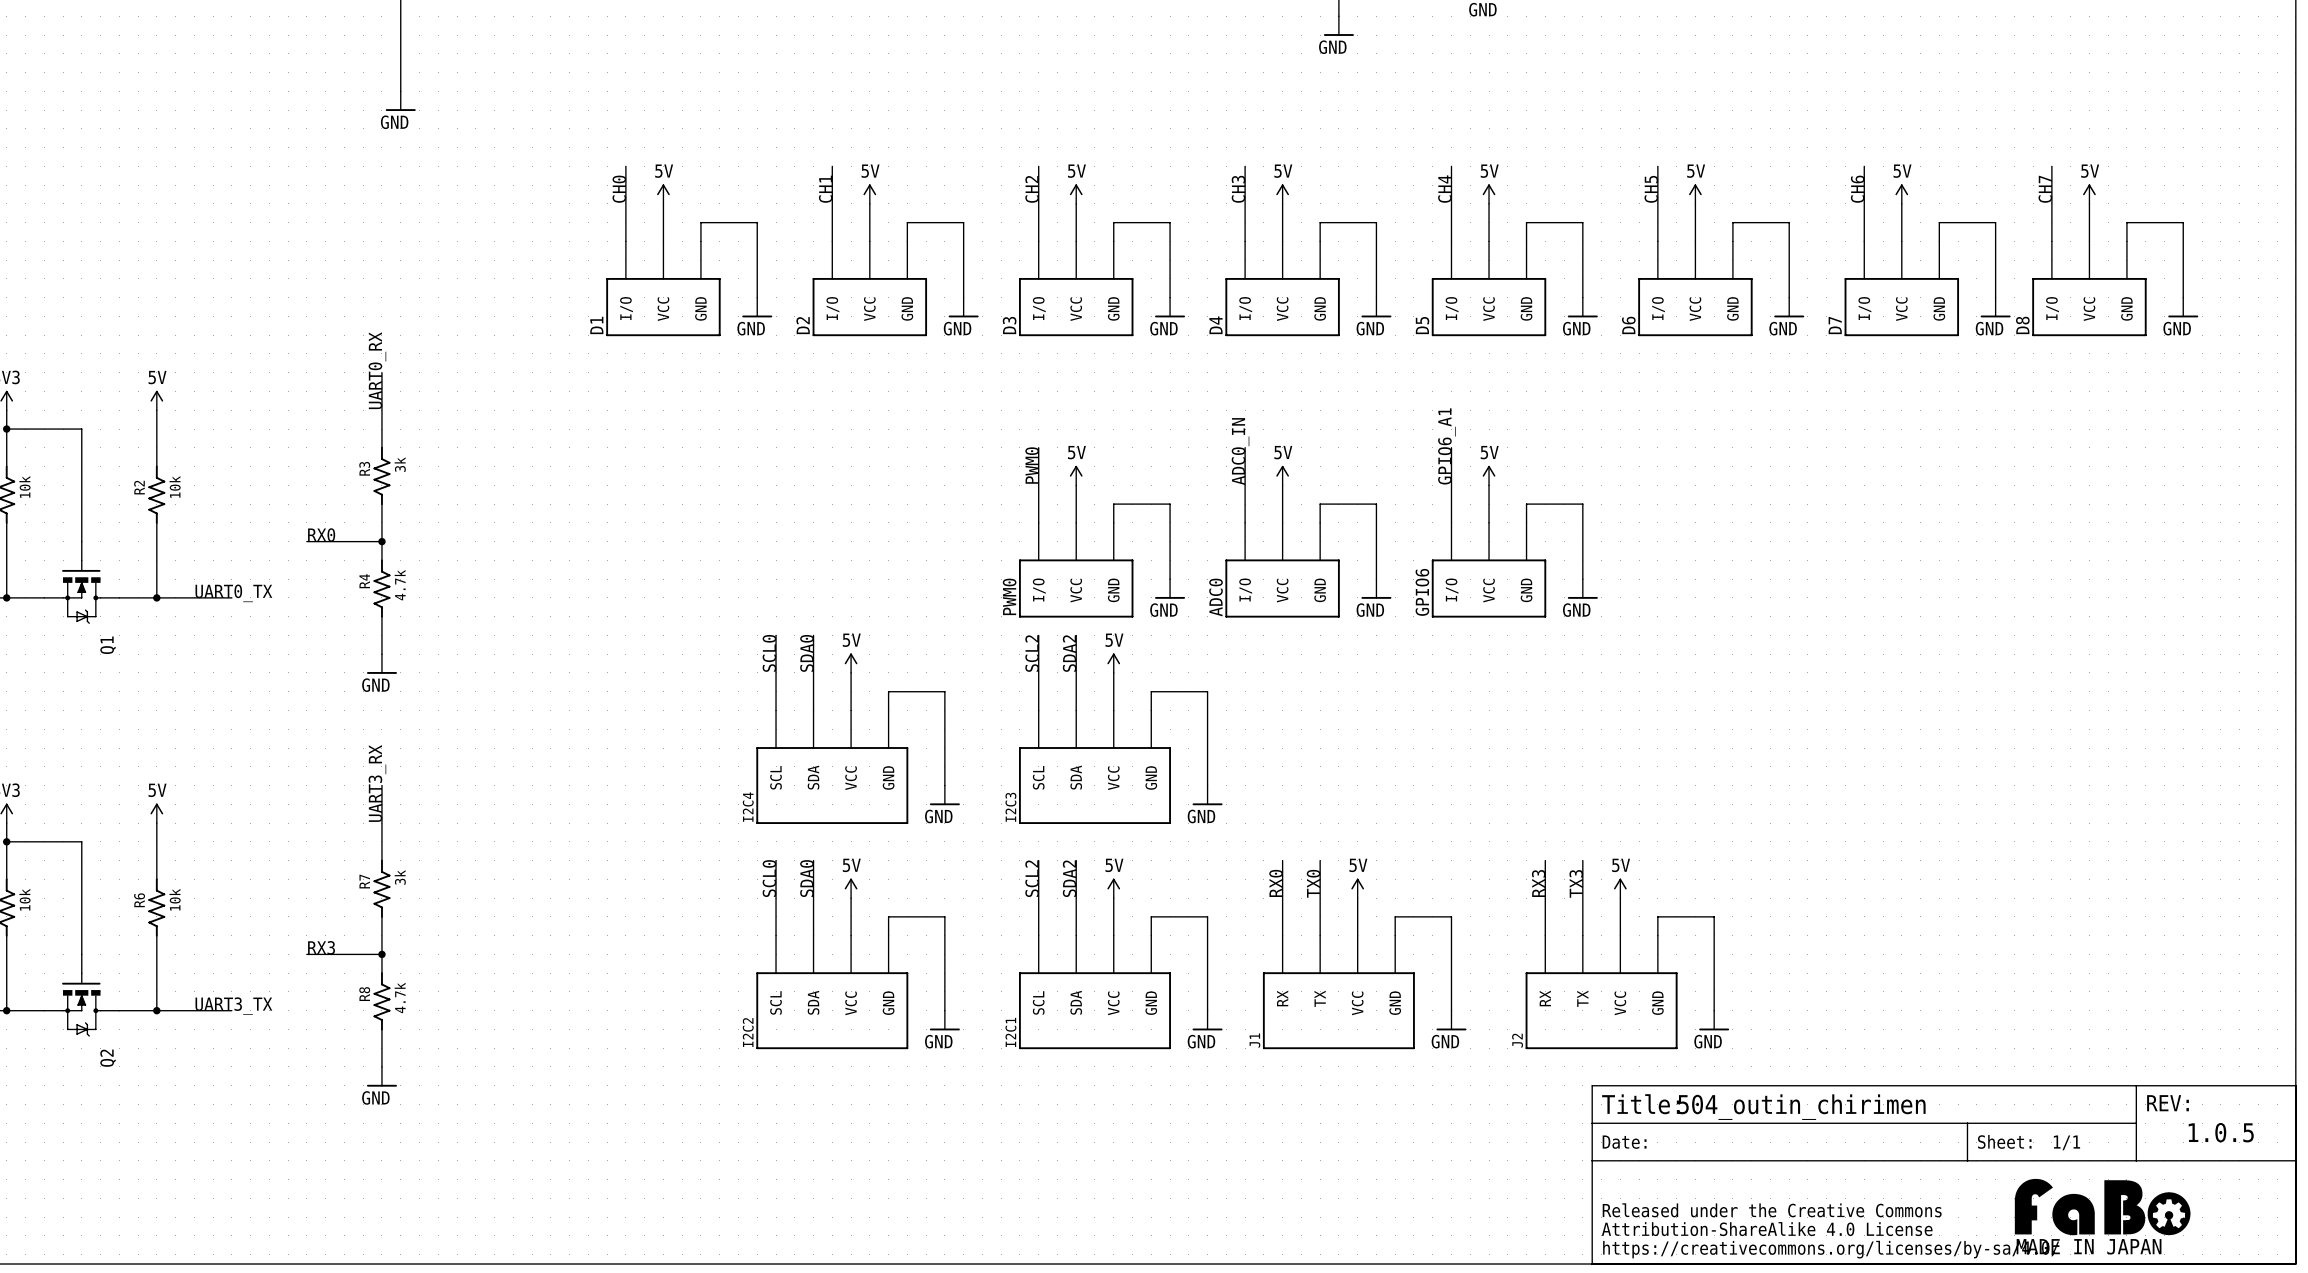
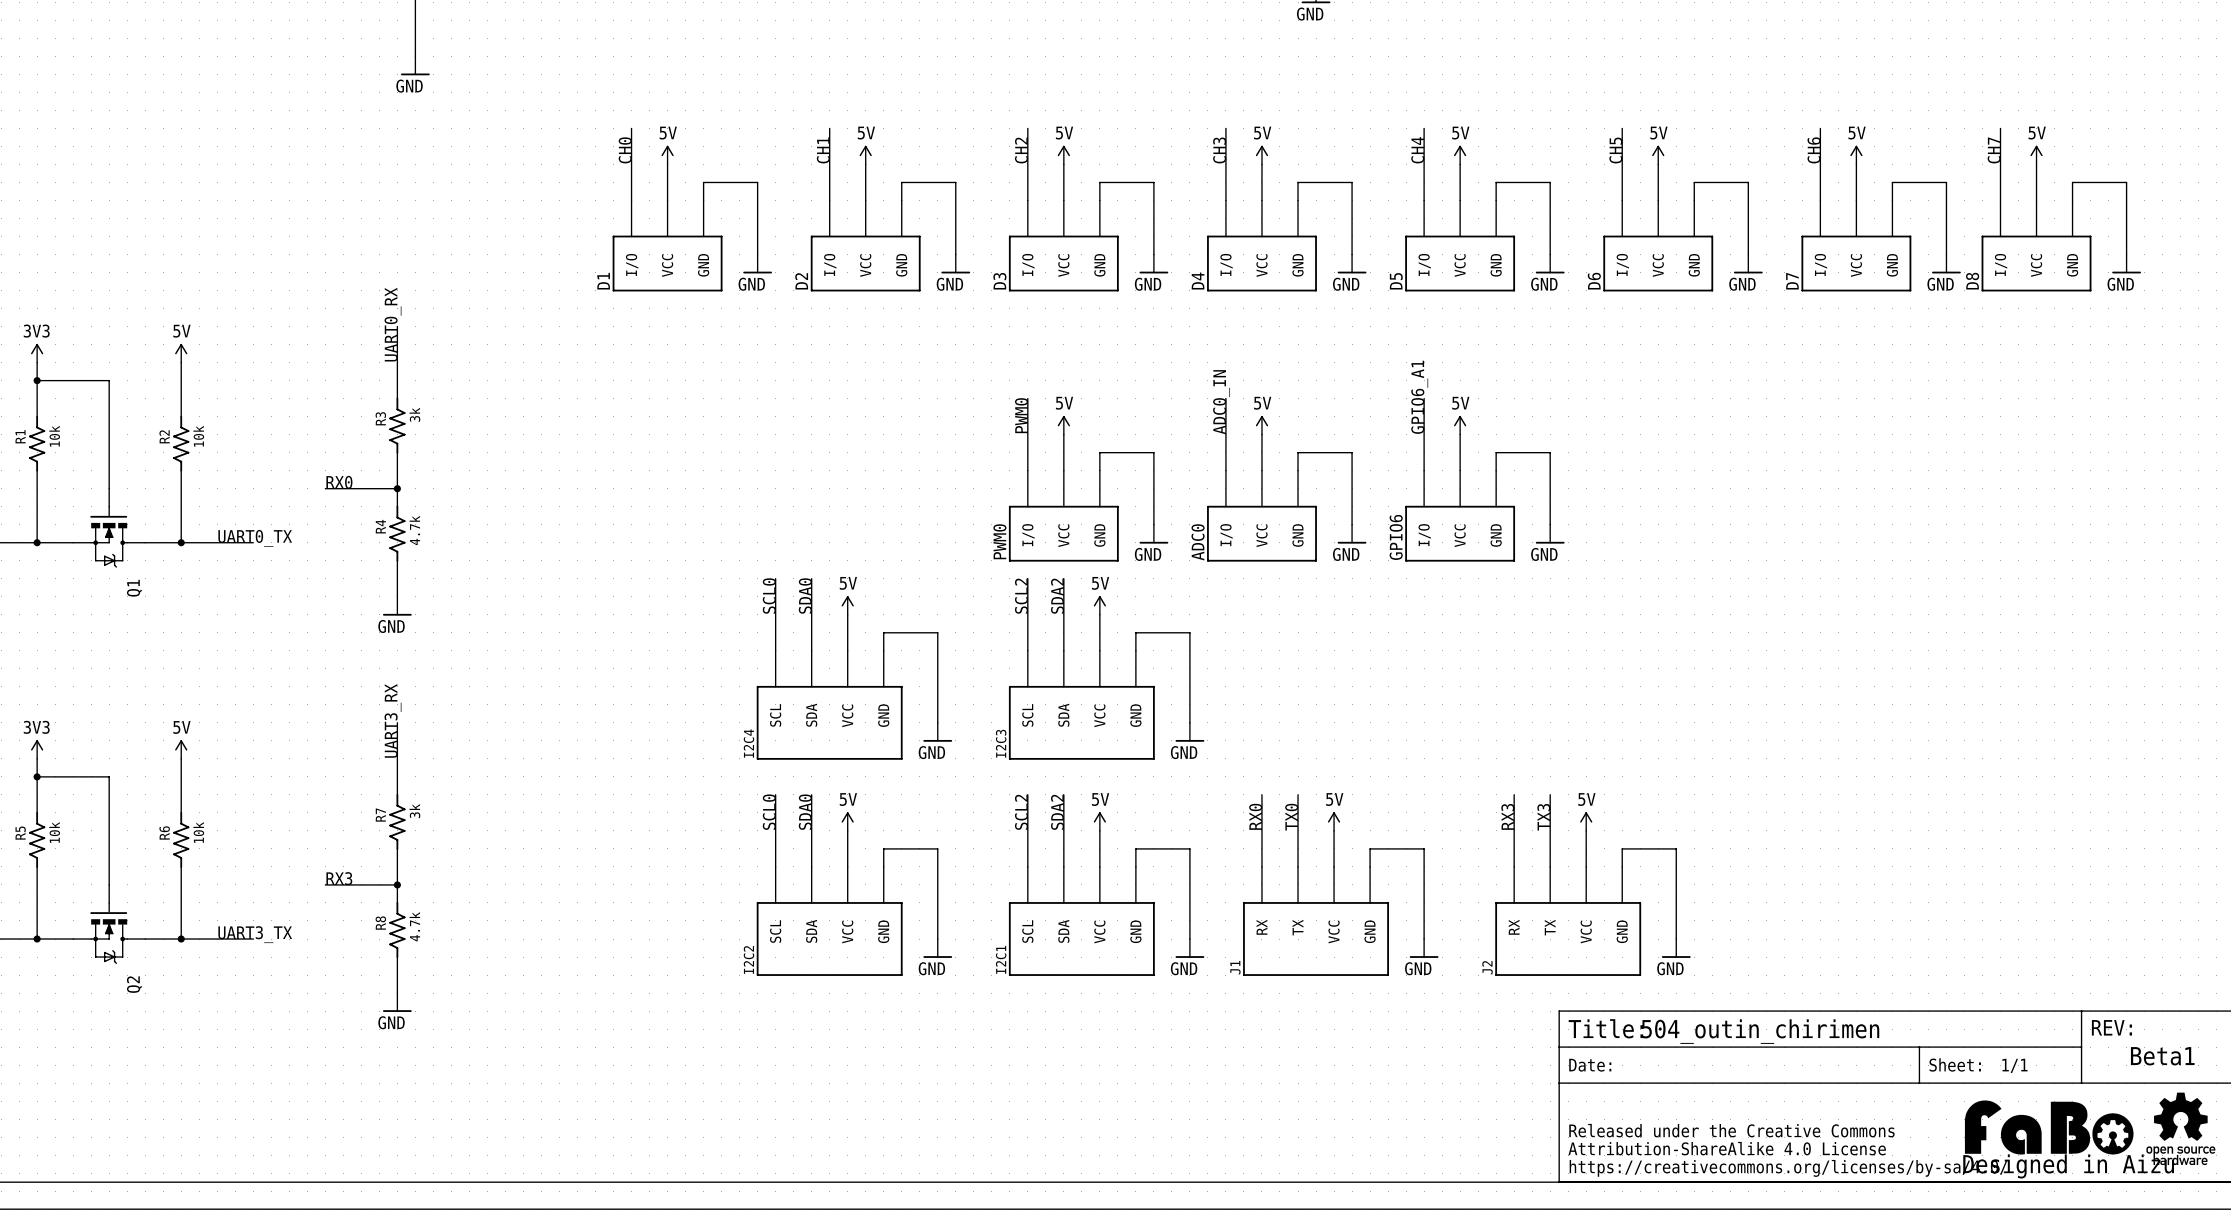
text: 1.0.5 (2221, 1132) -> Beta1 (2162, 1056)
part: none -> (2180, 1128)
part text: MADE IN JAPAN (2089, 1246) -> none
part text: none -> Designed in Aizu (2068, 1166)

